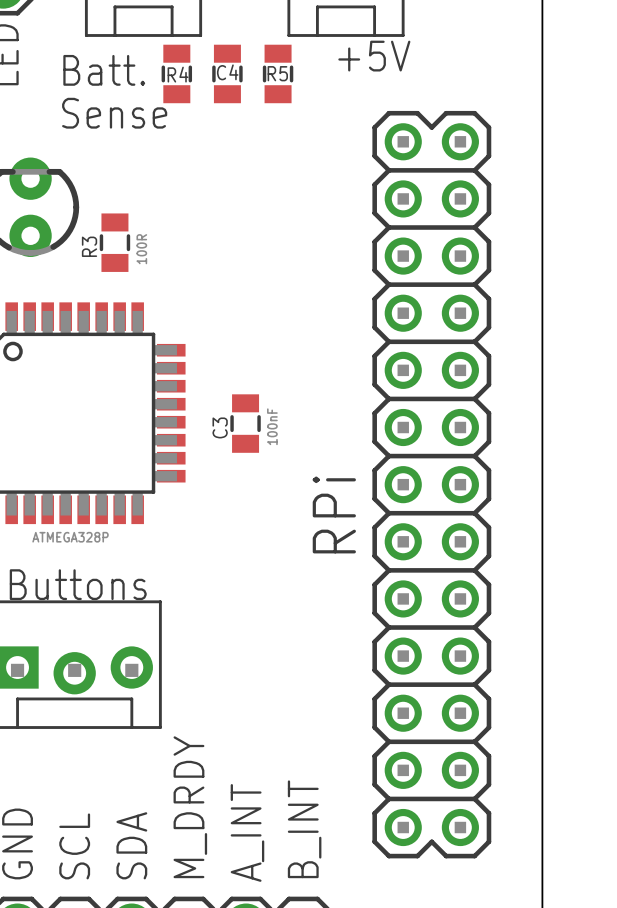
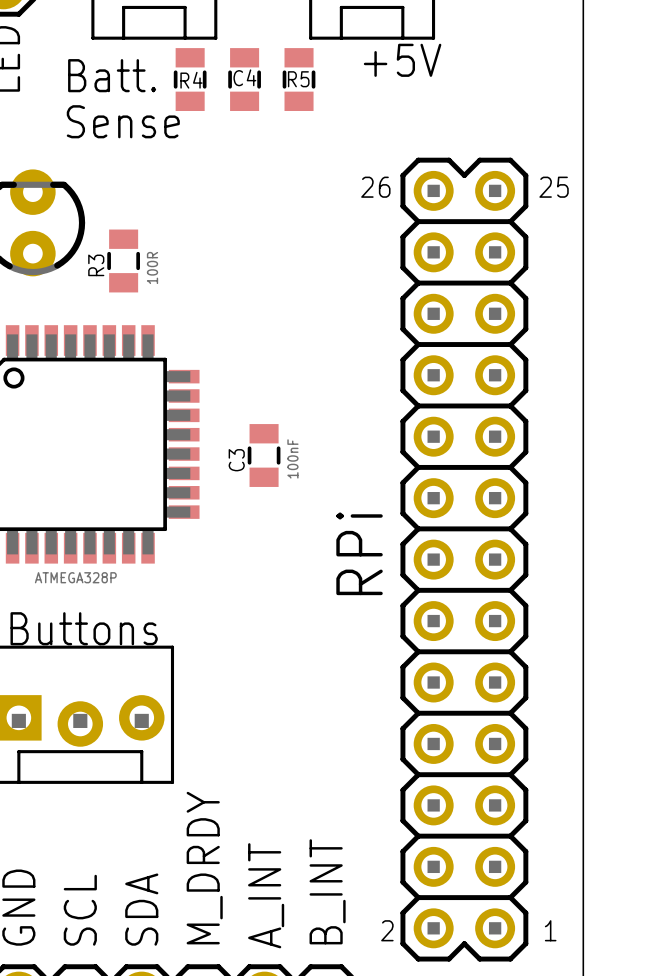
text: none -> 26 (375, 187)
text: none -> 25 (554, 187)
part position: (431, 484) -> (464, 559)
text: none -> 2 (387, 930)
text: none -> 1 (550, 930)

